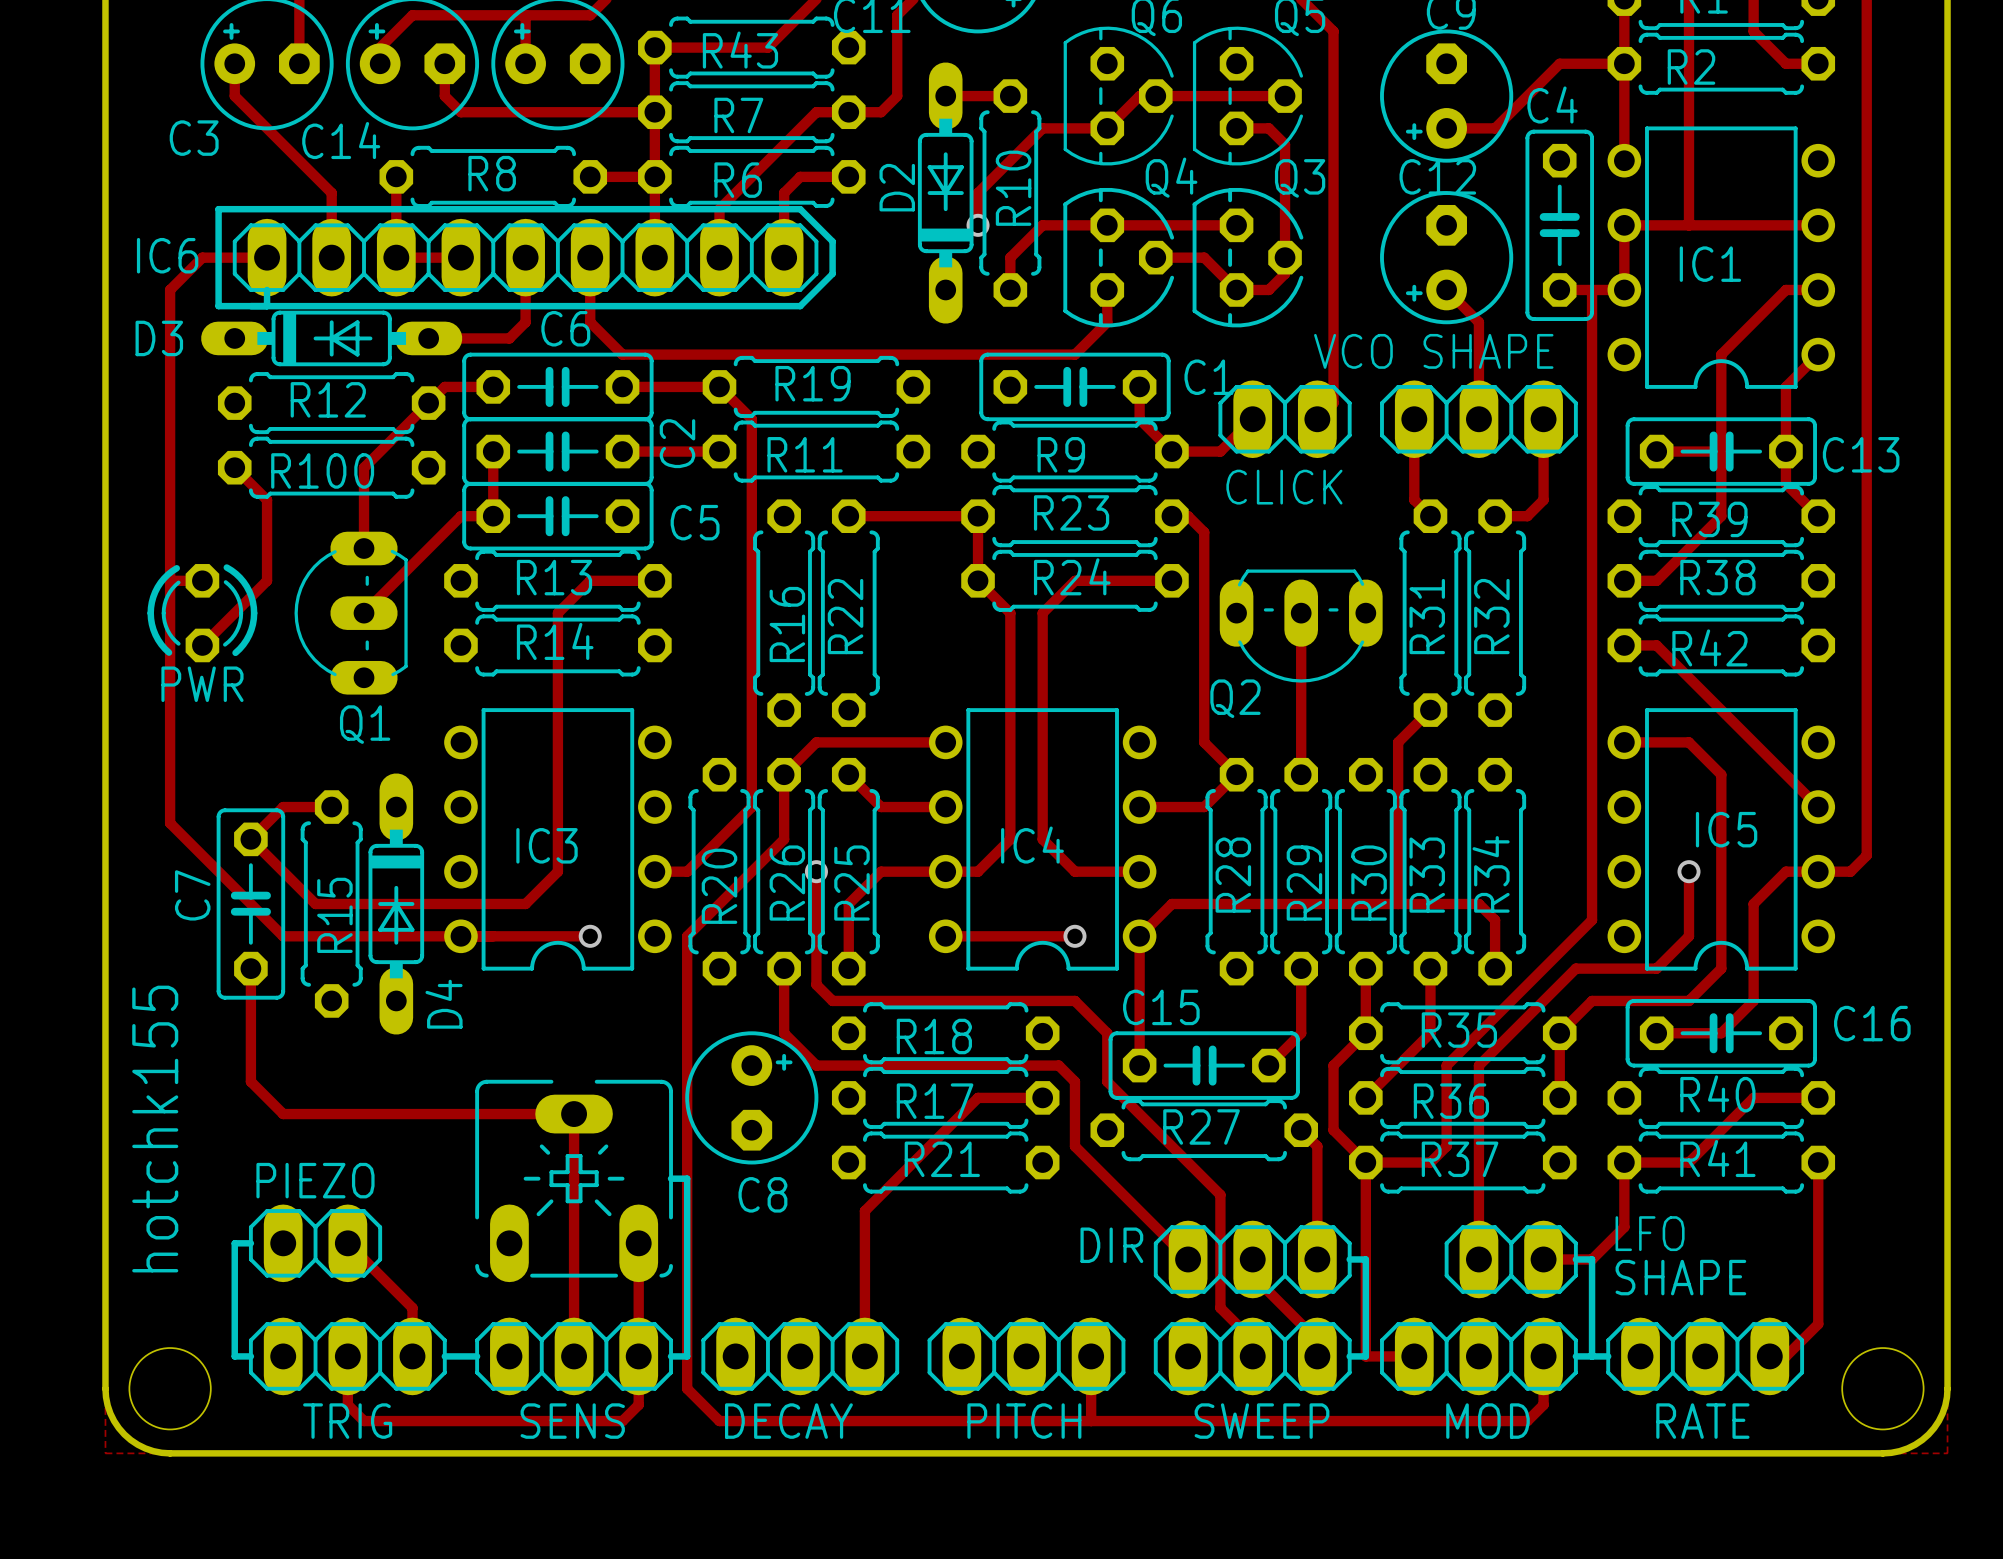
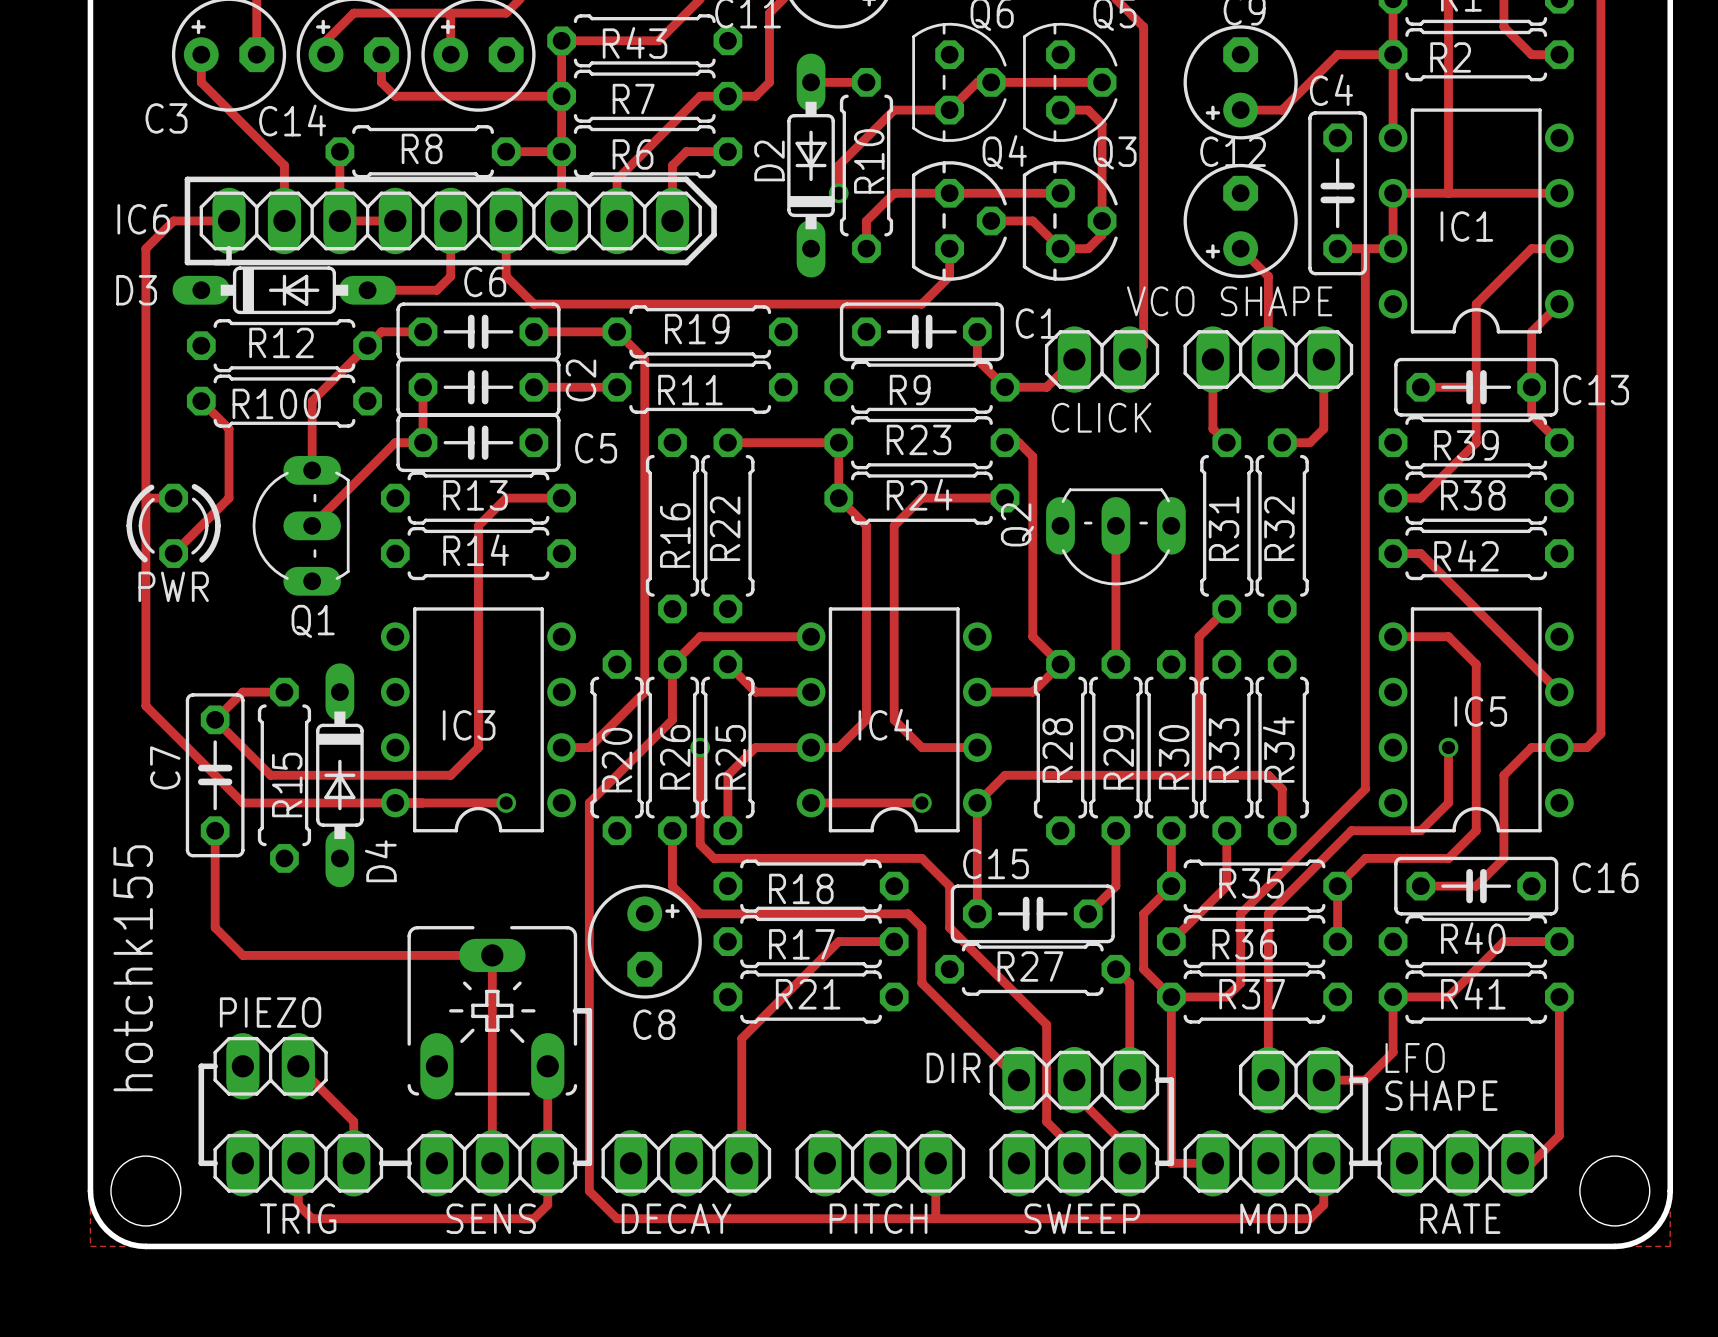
Q2 name rotation: 0° (1235, 698) -> 90° counterclockwise (1017, 524)
Q2 name position: Q2 (1235, 698) -> Q2 (1017, 524)

